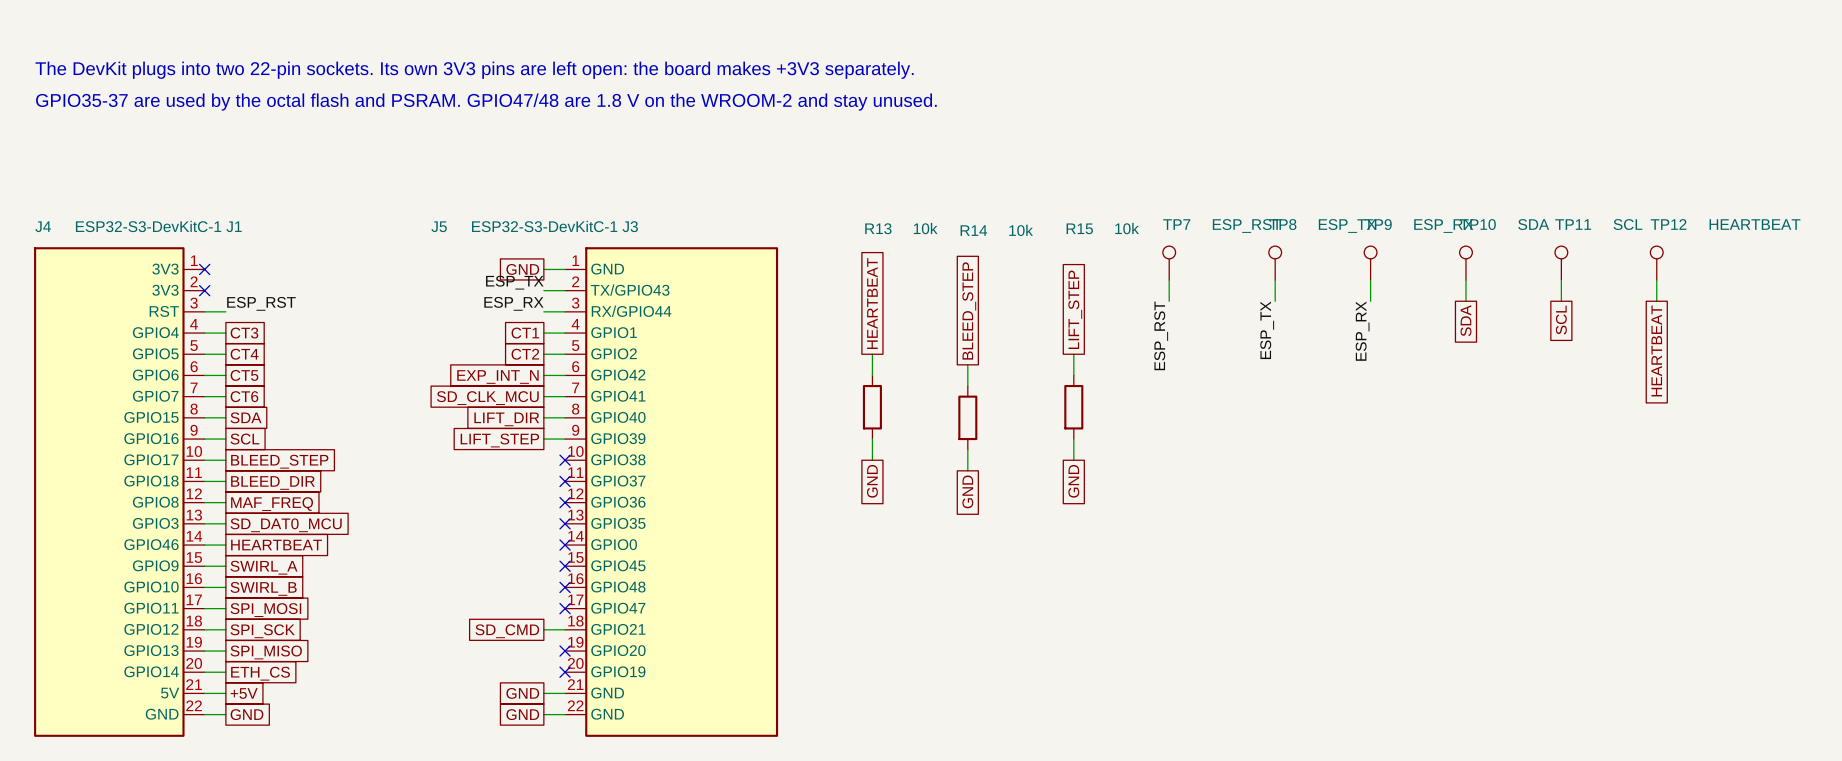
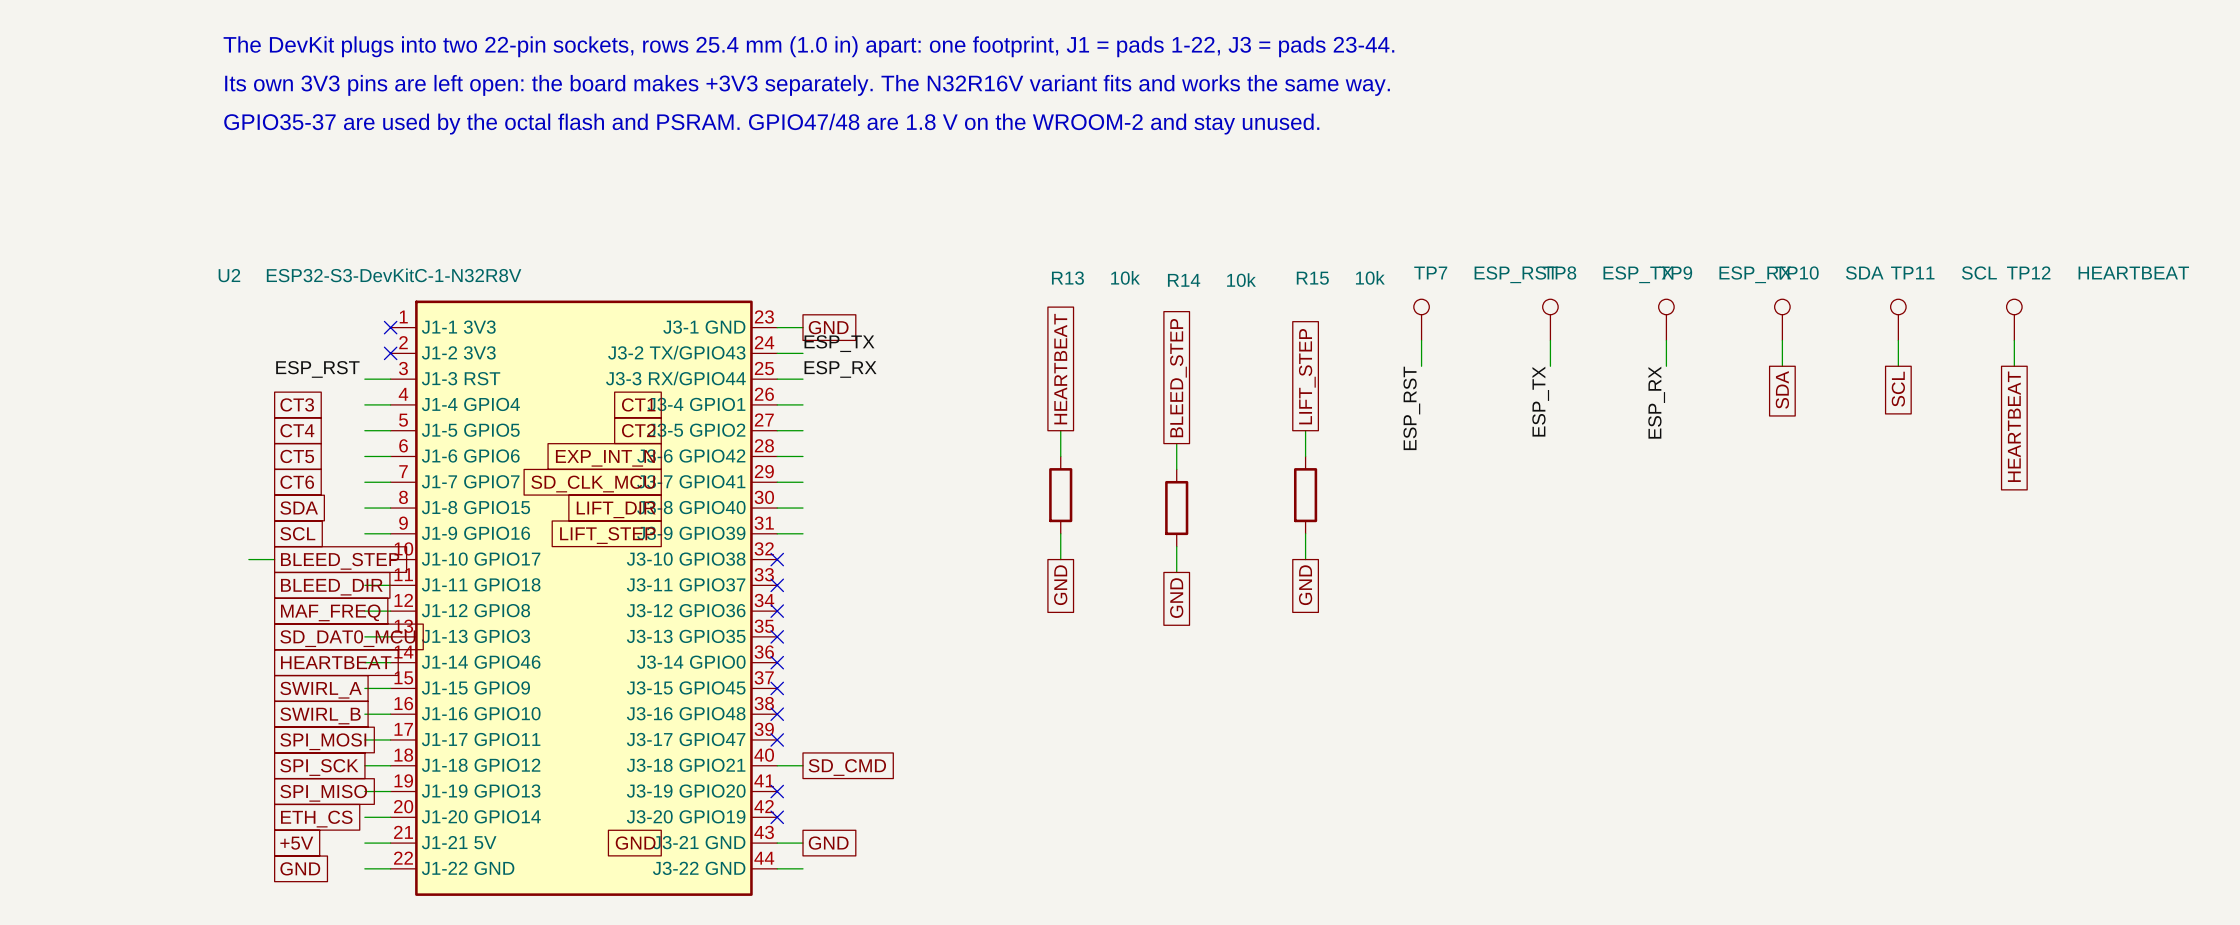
text: none -> The DevKit plugs into two 22-pin sockets, rows 25.4 mm (1.0 in) apart: one footprint, J1 = pads 1-22, J3 = pads 23-44. (808, 46)
text: The DevKit plugs into two 22-pin sockets. Its own 3V3 pins are left open: the board makes +3V3 separately. (474, 70) -> none
text: none -> Its own 3V3 pins are left open: the board makes +3V3 separately. The N32R16V variant fits and works the same way. (807, 85)
text position: GPIO35-37 are used by the octal flash and PSRAM. GPIO47/48 are 1.8 V on the WROOM-2 and stay unused. (486, 102) -> GPIO35-37 are used by the octal flash and PSRAM. GPIO47/48 are 1.8 V on the WROOM-2 and stay unused. (771, 124)
no-connect mark: (204, 269) -> none
no-connect mark: none -> (390, 327)
global label rotation: 0° (522, 269) -> 180° (828, 327)
global label position: GND (522, 269) -> GND (828, 327)
label position: ESP_TX (514, 282) -> ESP_TX (839, 343)
no-connect mark: (204, 290) -> none
no-connect mark: none -> (390, 353)
label position: ESP_RX (513, 303) -> ESP_RX (840, 369)
wire: (204, 311) (225, 311) -> (364, 379) (390, 379)
wire: (204, 333) (225, 333) -> (364, 404) (390, 404)
wire: (204, 354) (225, 354) -> (364, 430) (390, 430)
wire: (204, 375) (225, 375) -> (364, 456) (390, 456)
wire: (204, 396) (225, 396) -> (364, 482) (390, 482)
wire: (204, 417) (225, 417) -> (364, 508) (390, 508)
wire: (204, 439) (225, 439) -> (364, 533) (390, 533)
no-connect mark: (565, 460) -> none
no-connect mark: none -> (777, 559)
wire: (204, 481) (225, 481) -> (364, 585) (390, 585)
no-connect mark: (565, 481) -> none
no-connect mark: none -> (777, 585)
J4: ESP32-S3-DevKitC-1 J1 (119, 492) -> none
U2: none -> ESP32-S3-DevKitC-1-N32R8V (583, 598)
J5: ESP32-S3-DevKitC-1 J3 (671, 492) -> none
wire: (204, 502) (225, 502) -> (364, 611) (390, 611)
no-connect mark: (565, 502) -> none
no-connect mark: none -> (777, 611)
wire: (204, 523) (225, 523) -> (364, 636) (390, 636)
no-connect mark: (565, 523) -> none
no-connect mark: none -> (777, 636)
wire: (204, 545) (225, 545) -> (364, 662) (390, 662)
no-connect mark: (565, 545) -> none
no-connect mark: none -> (777, 662)
wire: (204, 566) (225, 566) -> (364, 688) (390, 688)
no-connect mark: (565, 566) -> none
no-connect mark: none -> (777, 688)
wire: (204, 587) (225, 587) -> (364, 714) (390, 714)
no-connect mark: (565, 587) -> none
no-connect mark: none -> (777, 714)
wire: (204, 608) (225, 608) -> (364, 739) (390, 739)
no-connect mark: (565, 608) -> none
no-connect mark: none -> (777, 739)
wire: (204, 629) (225, 629) -> (364, 765) (390, 765)
global label rotation: 0° (507, 631) -> 180° (847, 767)
global label position: SD_CMD (507, 631) -> SD_CMD (847, 767)
wire: (204, 651) (225, 651) -> (364, 791) (390, 791)
no-connect mark: (565, 651) -> none
no-connect mark: none -> (777, 791)
wire: (204, 672) (225, 672) -> (364, 817) (390, 817)
no-connect mark: (565, 672) -> none
no-connect mark: none -> (777, 817)
wire: (204, 693) (225, 693) -> (364, 843) (390, 843)
wire: (204, 714) (225, 714) -> (364, 868) (390, 868)
global label rotation: 0° (522, 714) -> 180° (828, 843)
global label position: GND (522, 714) -> GND (828, 843)

